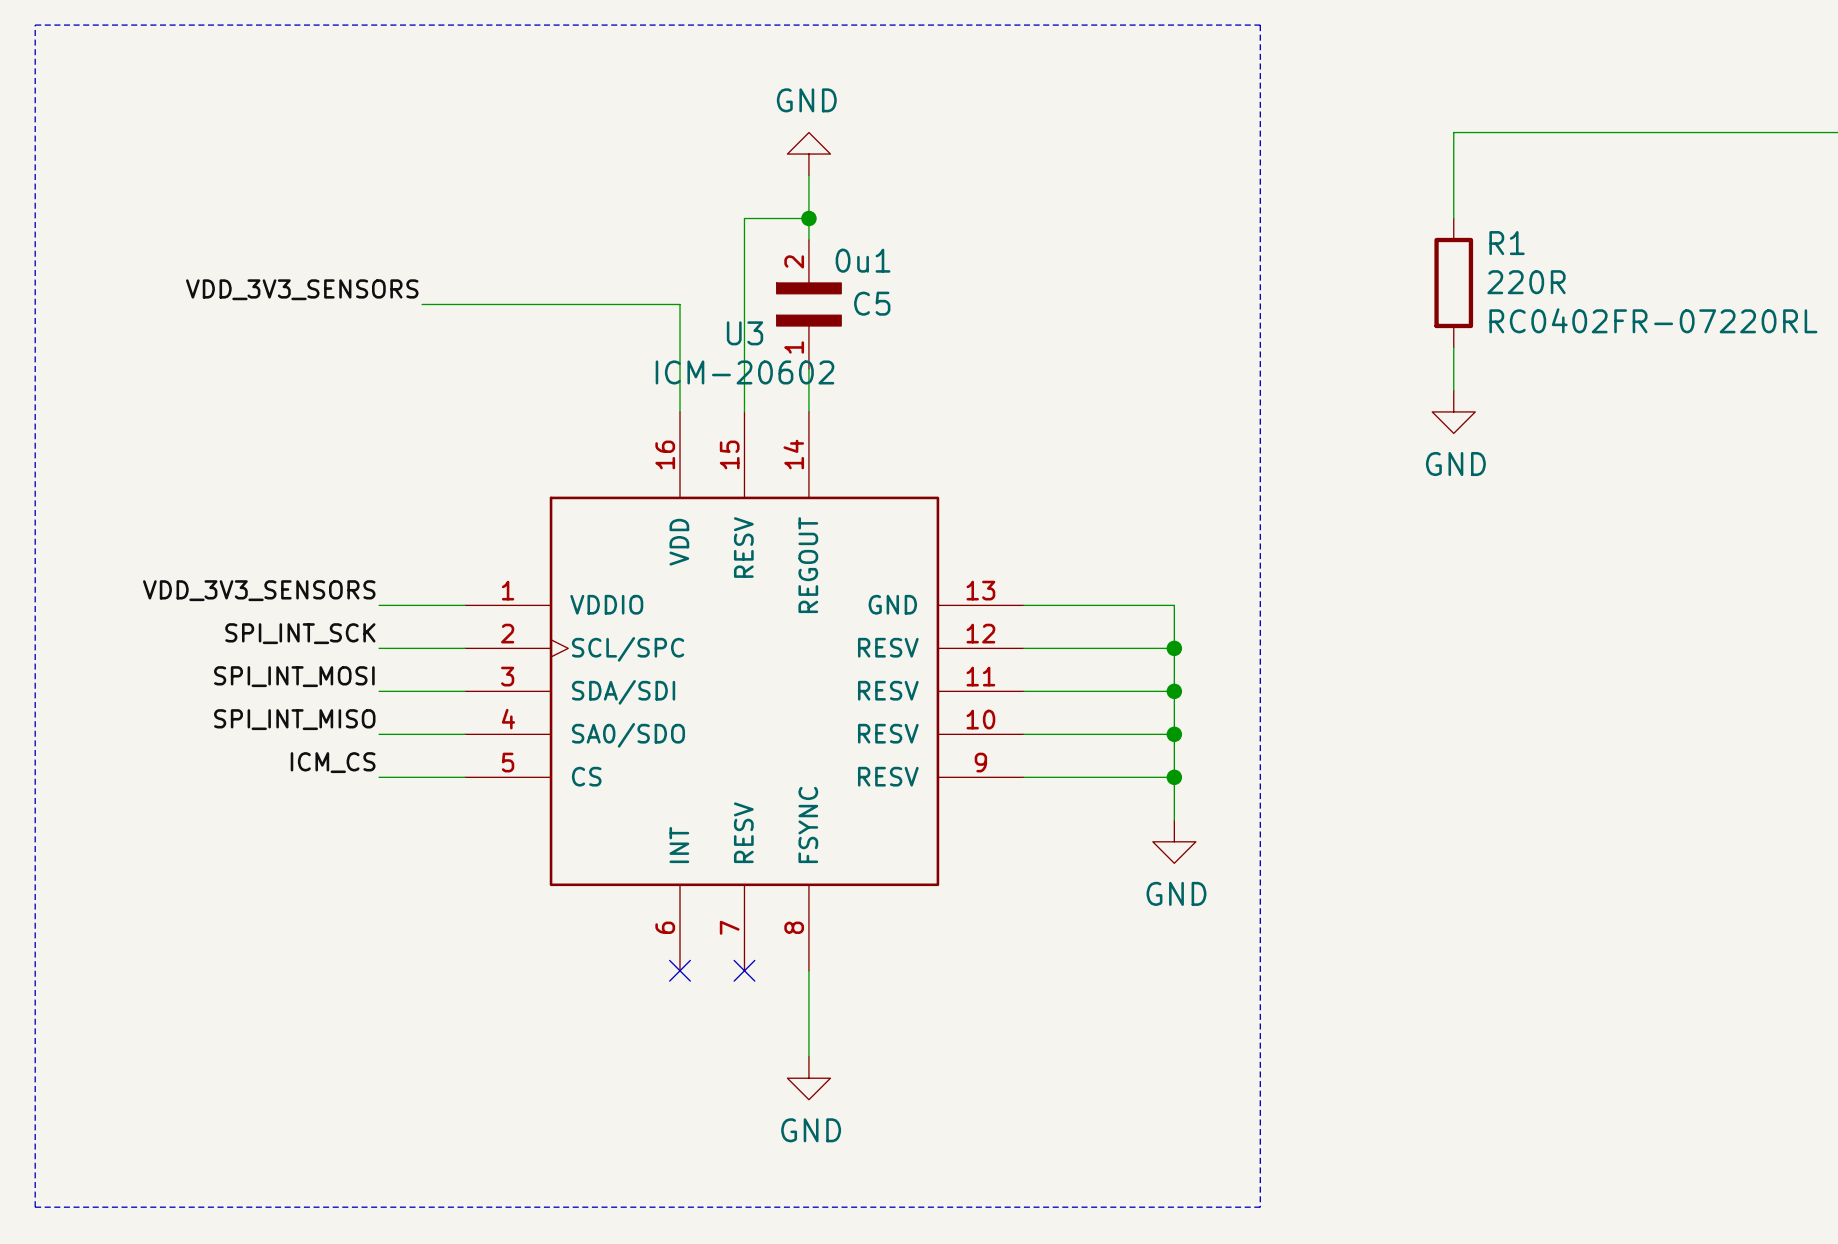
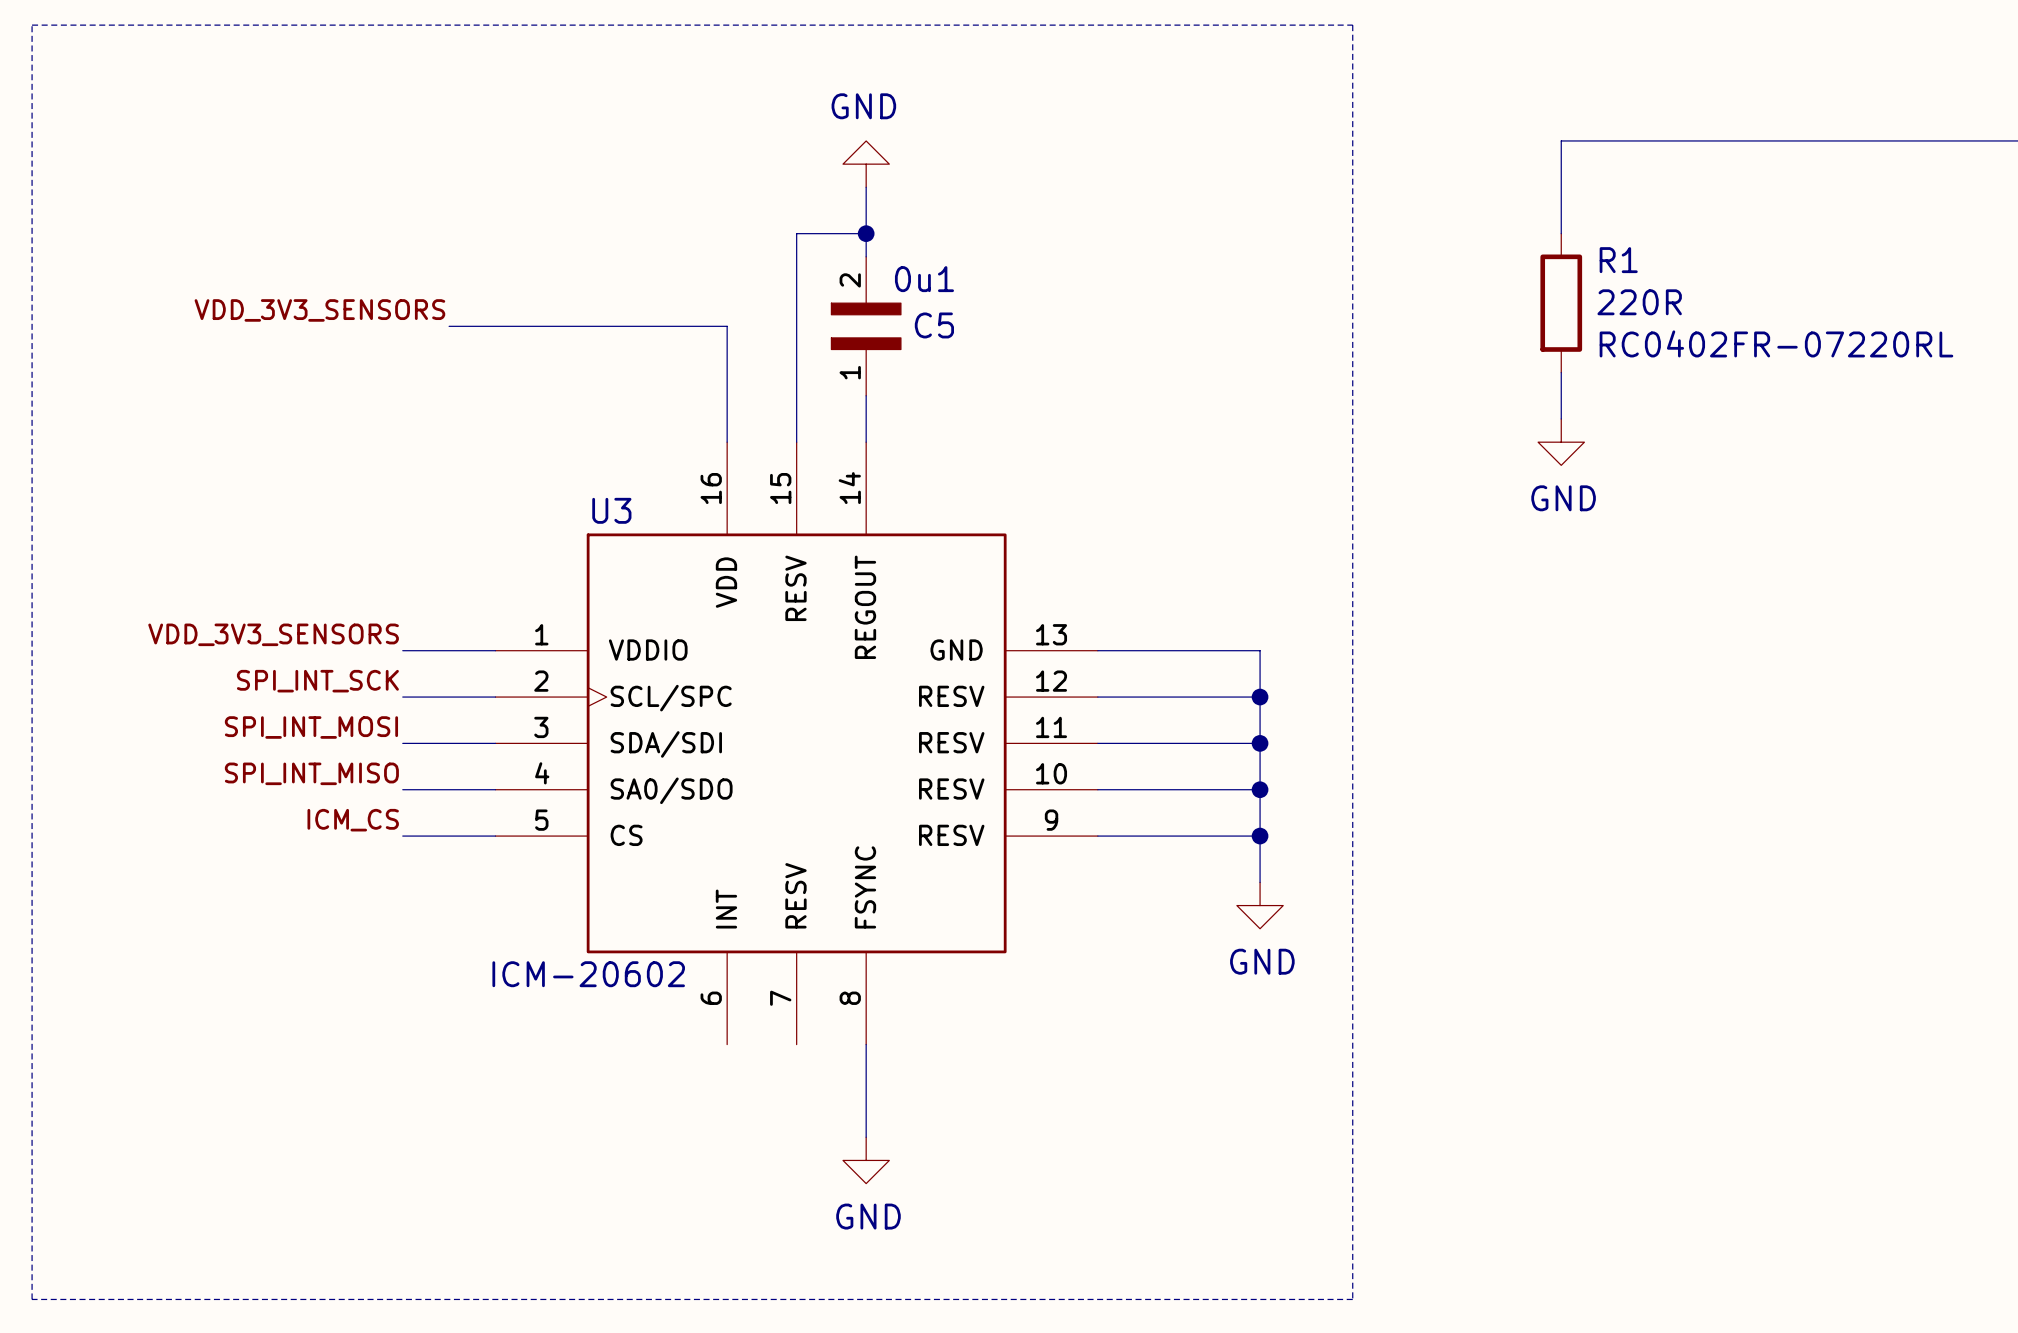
U3 name position: U3 (744, 333) -> U3 (611, 510)
U3 value position: ICM-20602 (744, 372) -> ICM-20602 (588, 974)
no-connect mark: (680, 970) -> none
no-connect mark: (744, 970) -> none

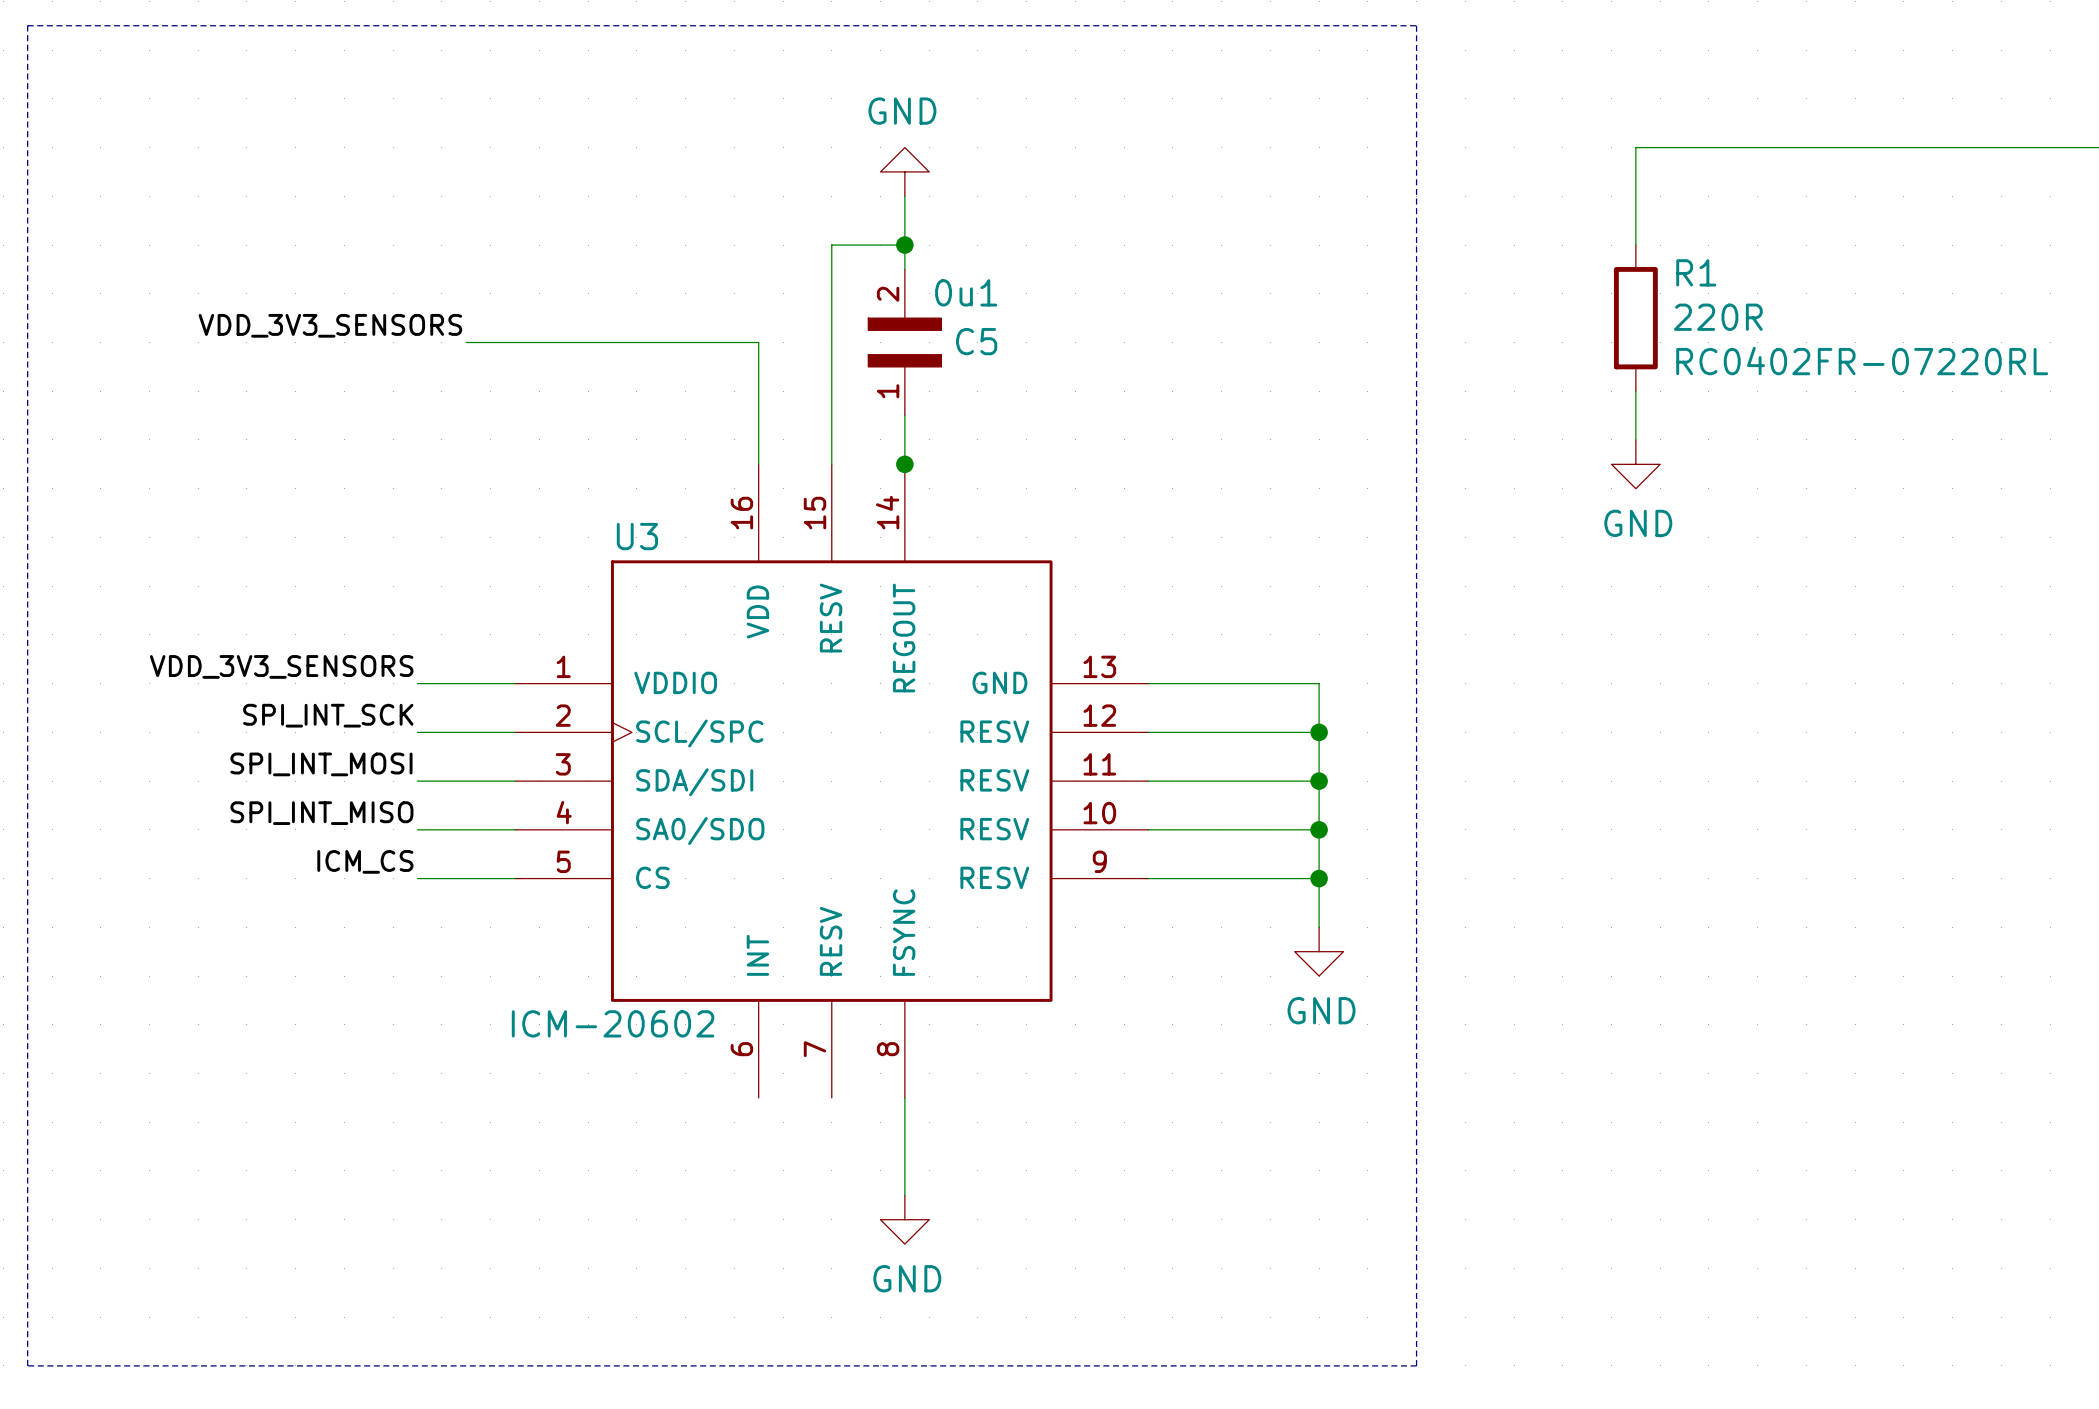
junction: none -> (904, 464)

